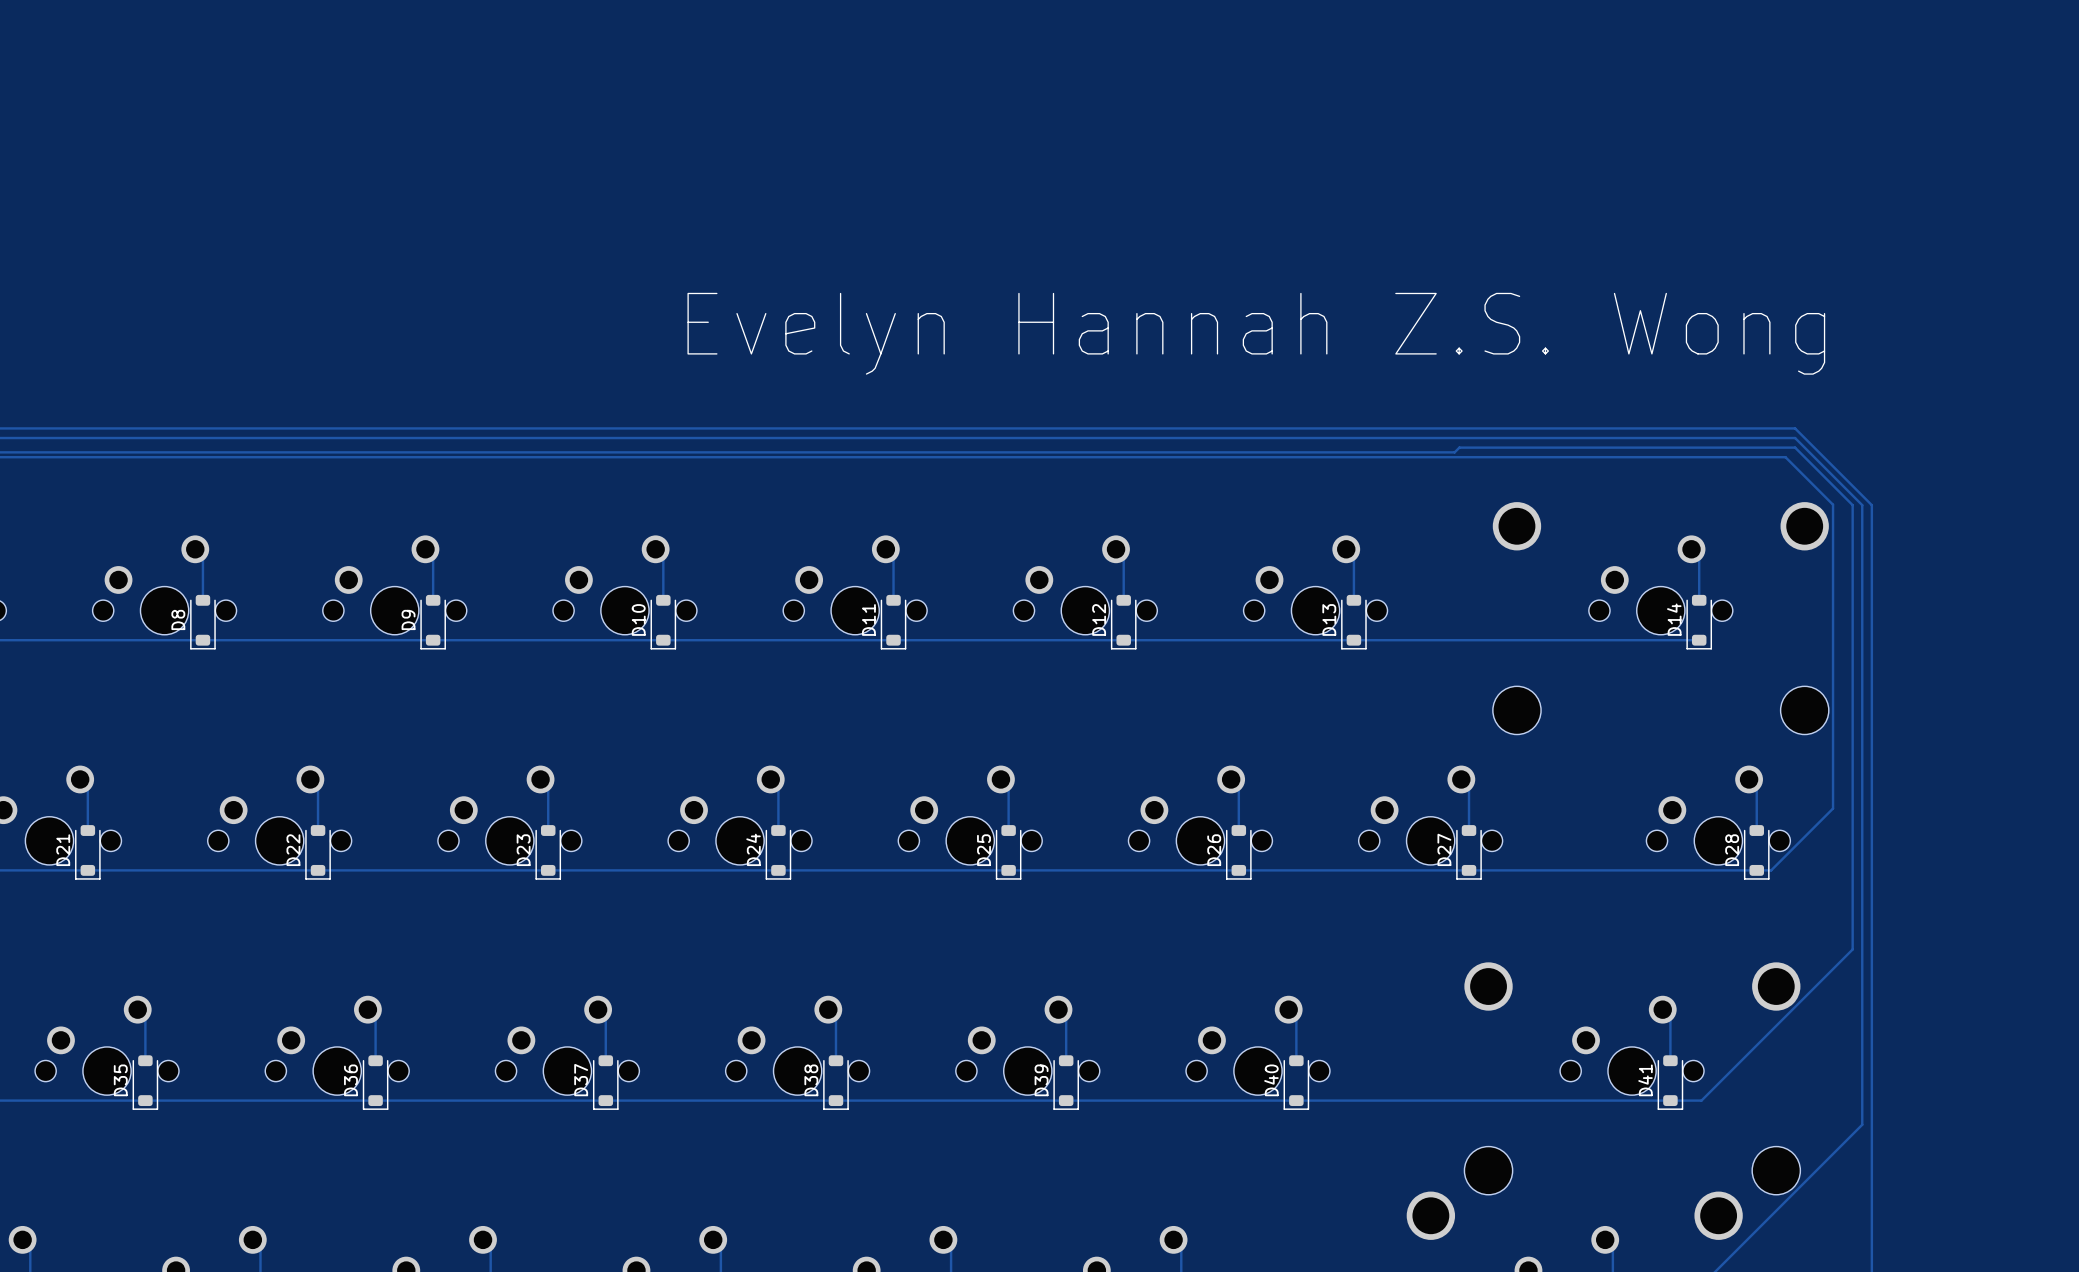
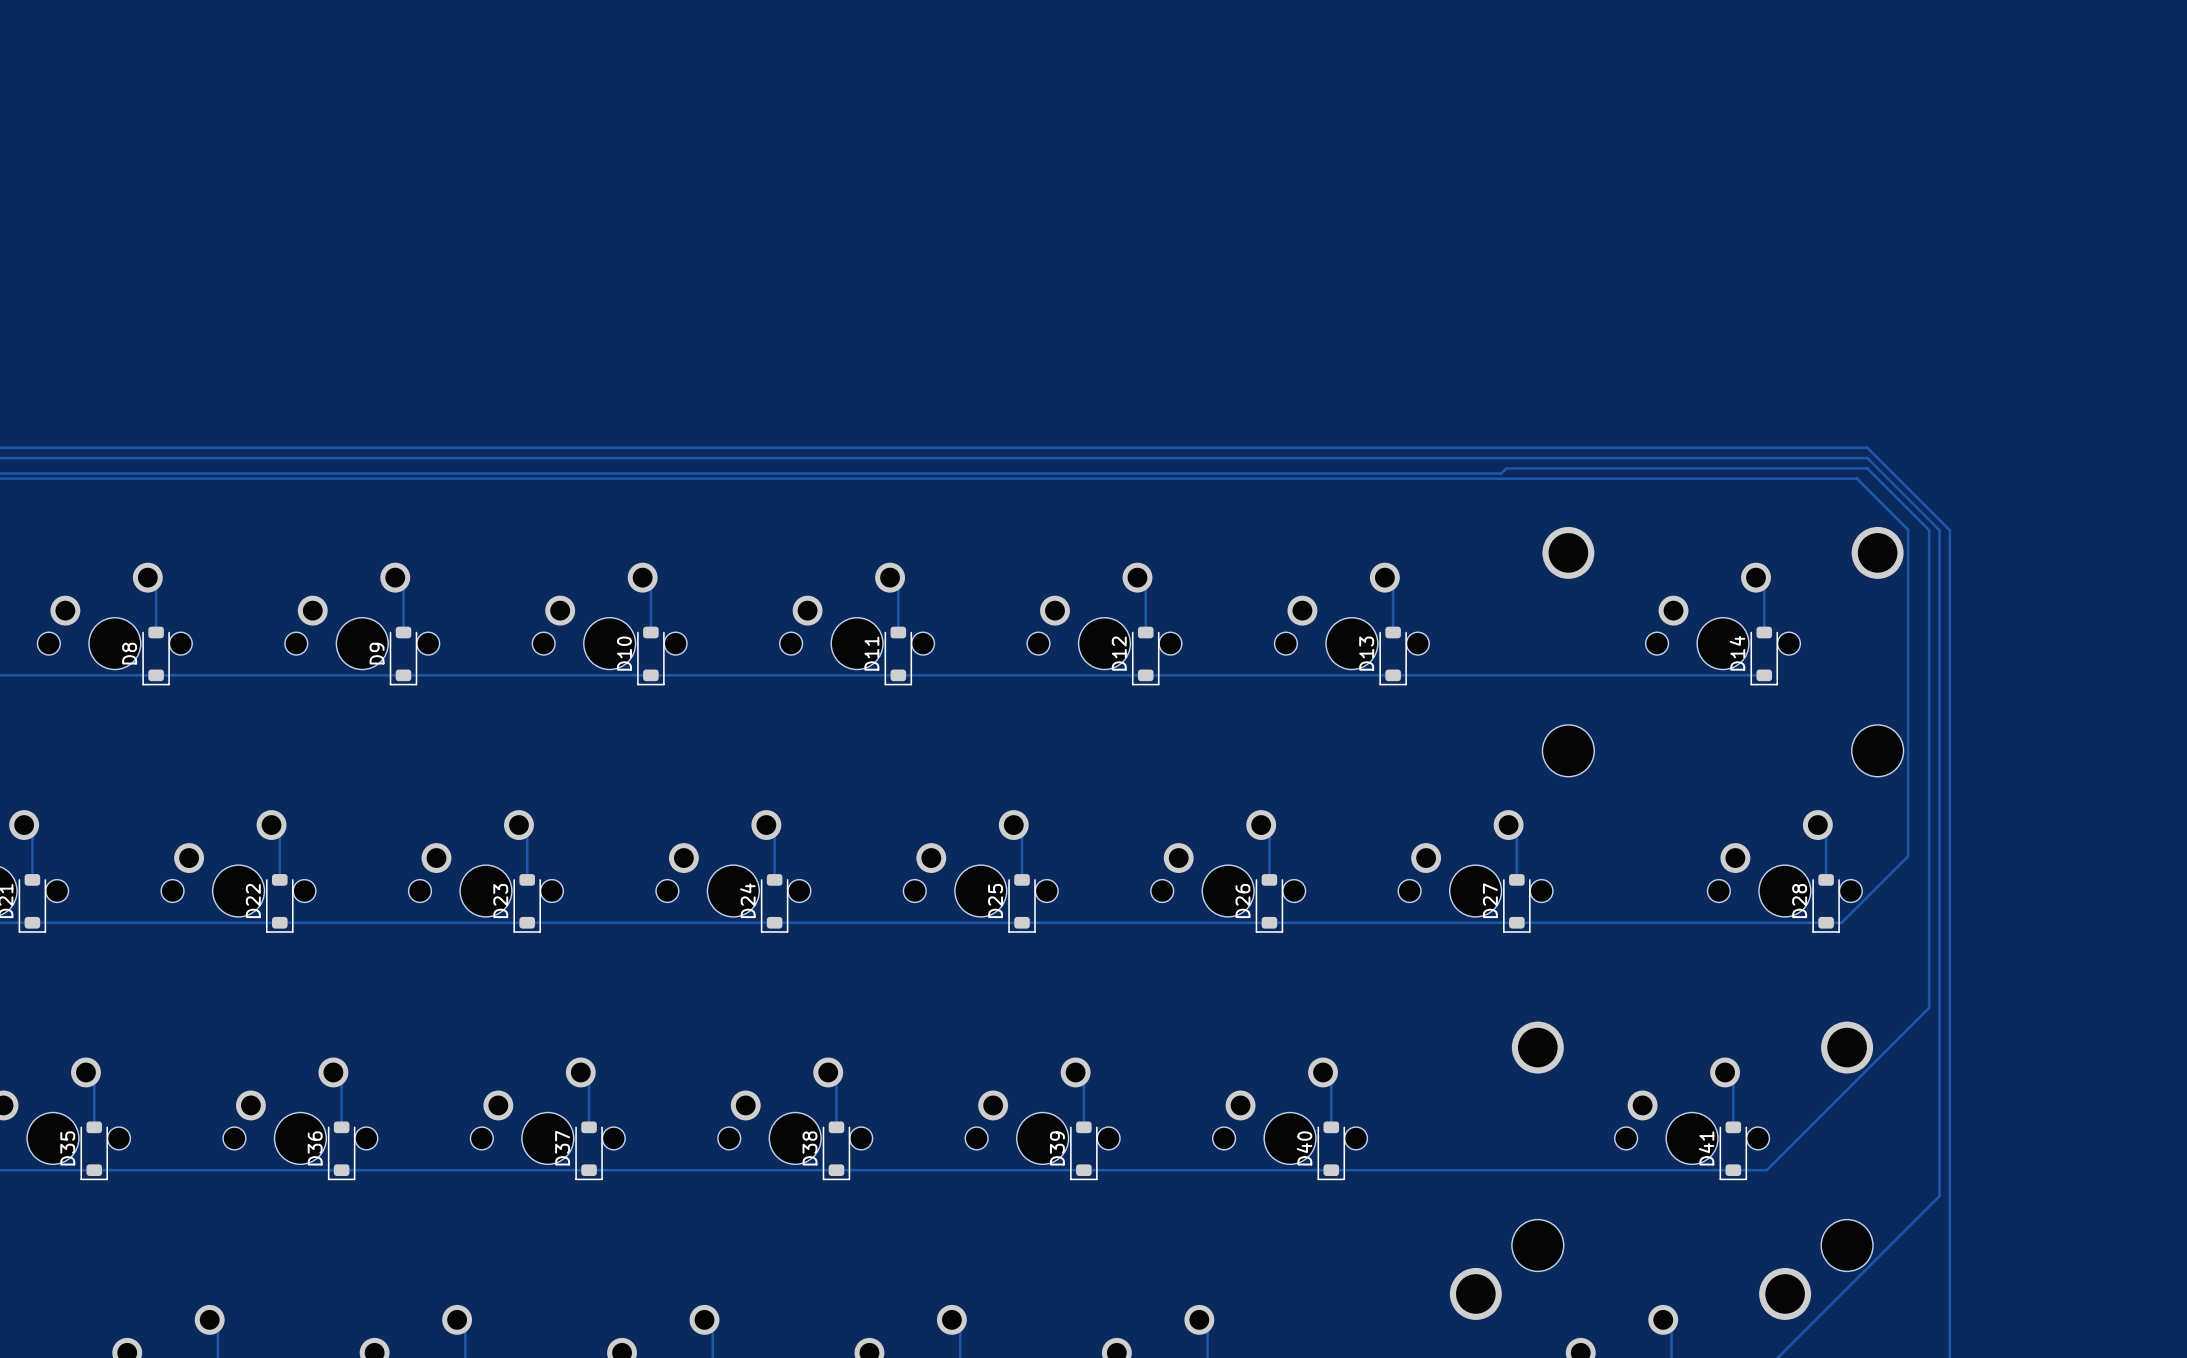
text: Evelyn Hannah Z.S. Wong (1256, 333) -> none

